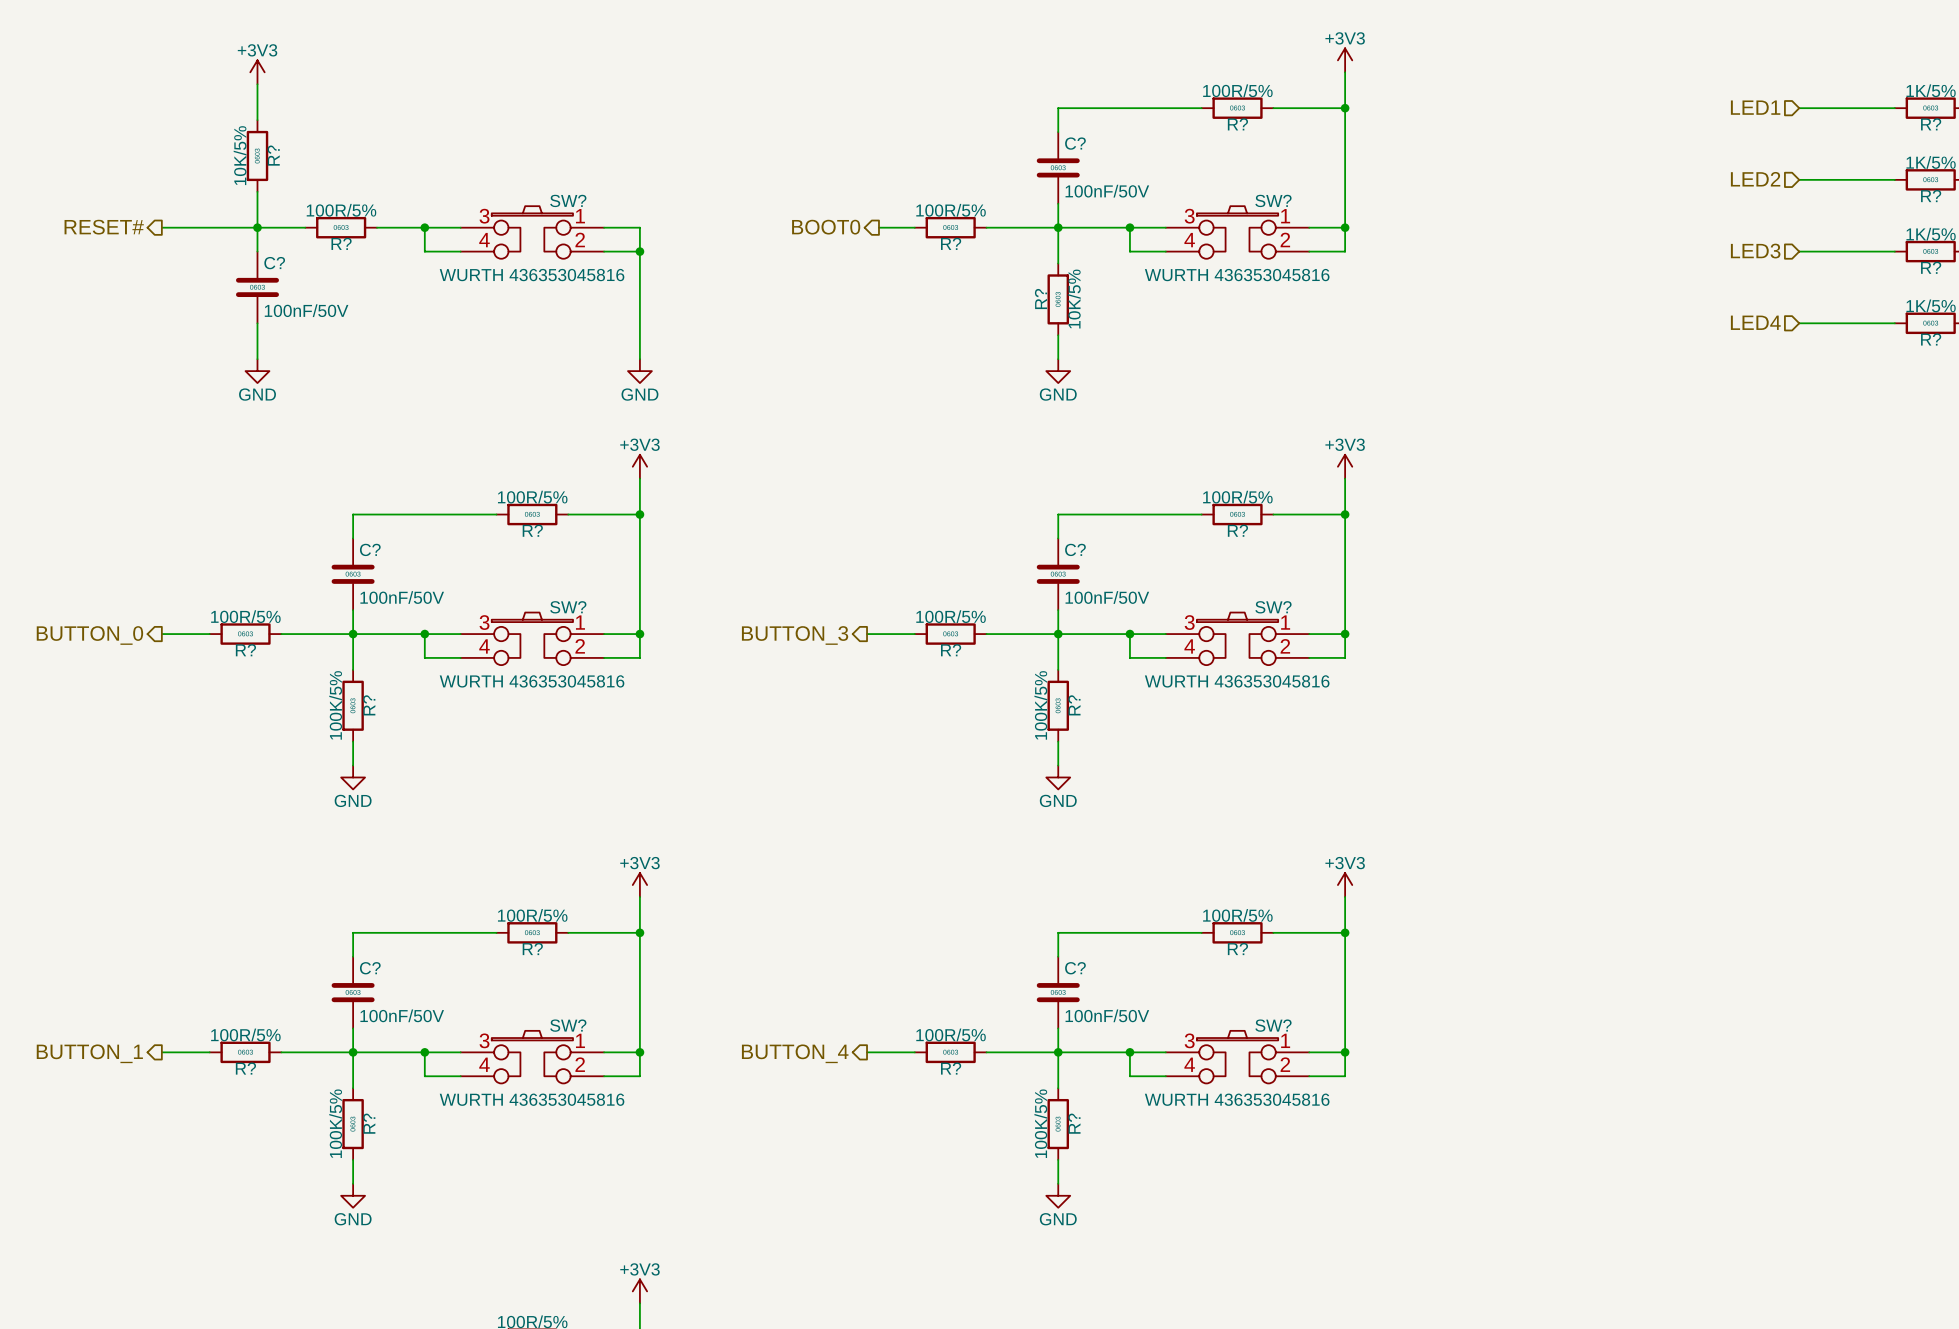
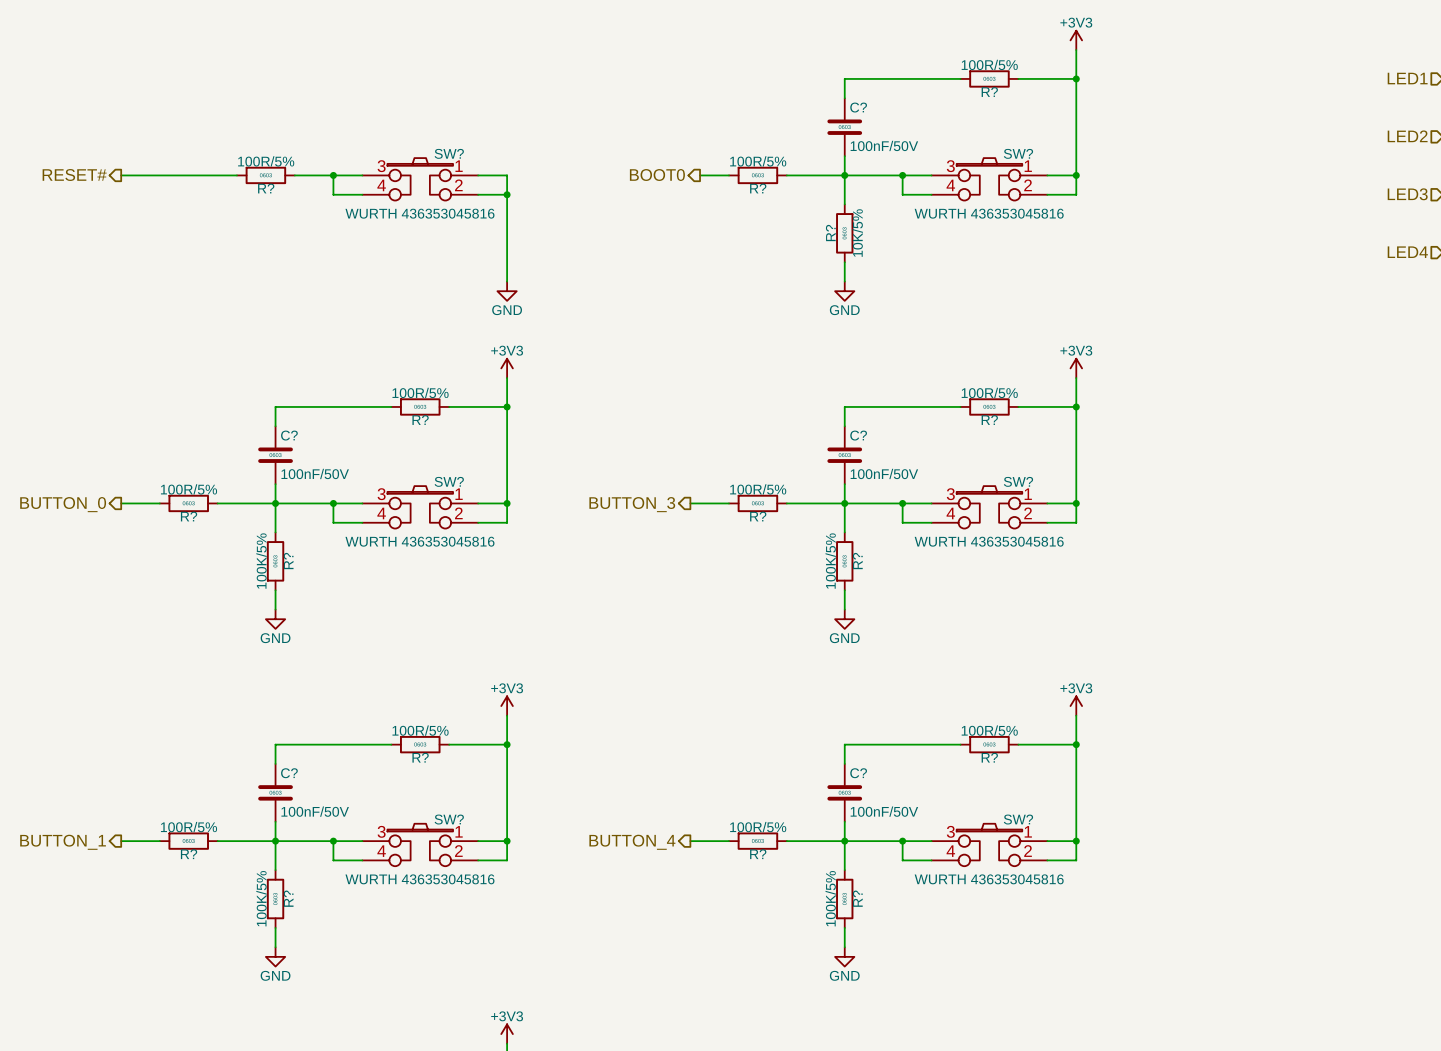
power symbol: +3V3 (257, 72) -> none
wire: (257, 84) (257, 120) -> none
R?: 10K/5% (257, 155) -> none
wire: (257, 191) (257, 251) -> none
junction: (257, 227) -> none
C?: 100nF/50V (257, 287) -> none
wire: (257, 323) (257, 359) -> none
power symbol: GND (257, 371) -> none

